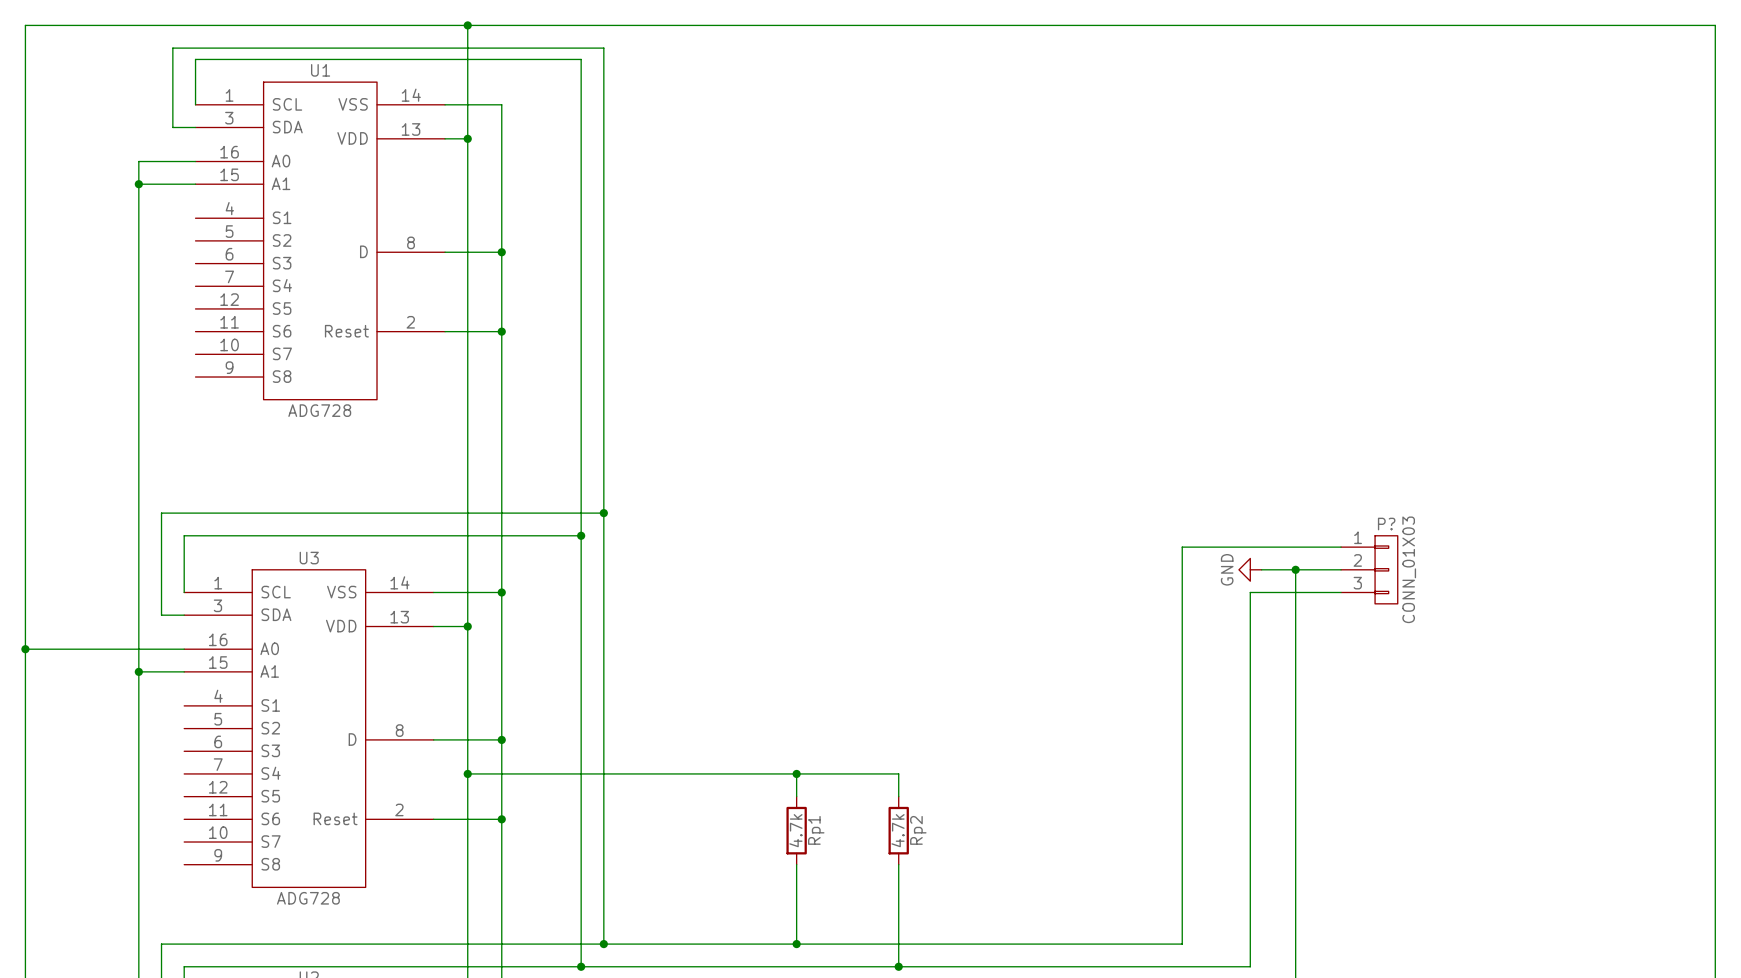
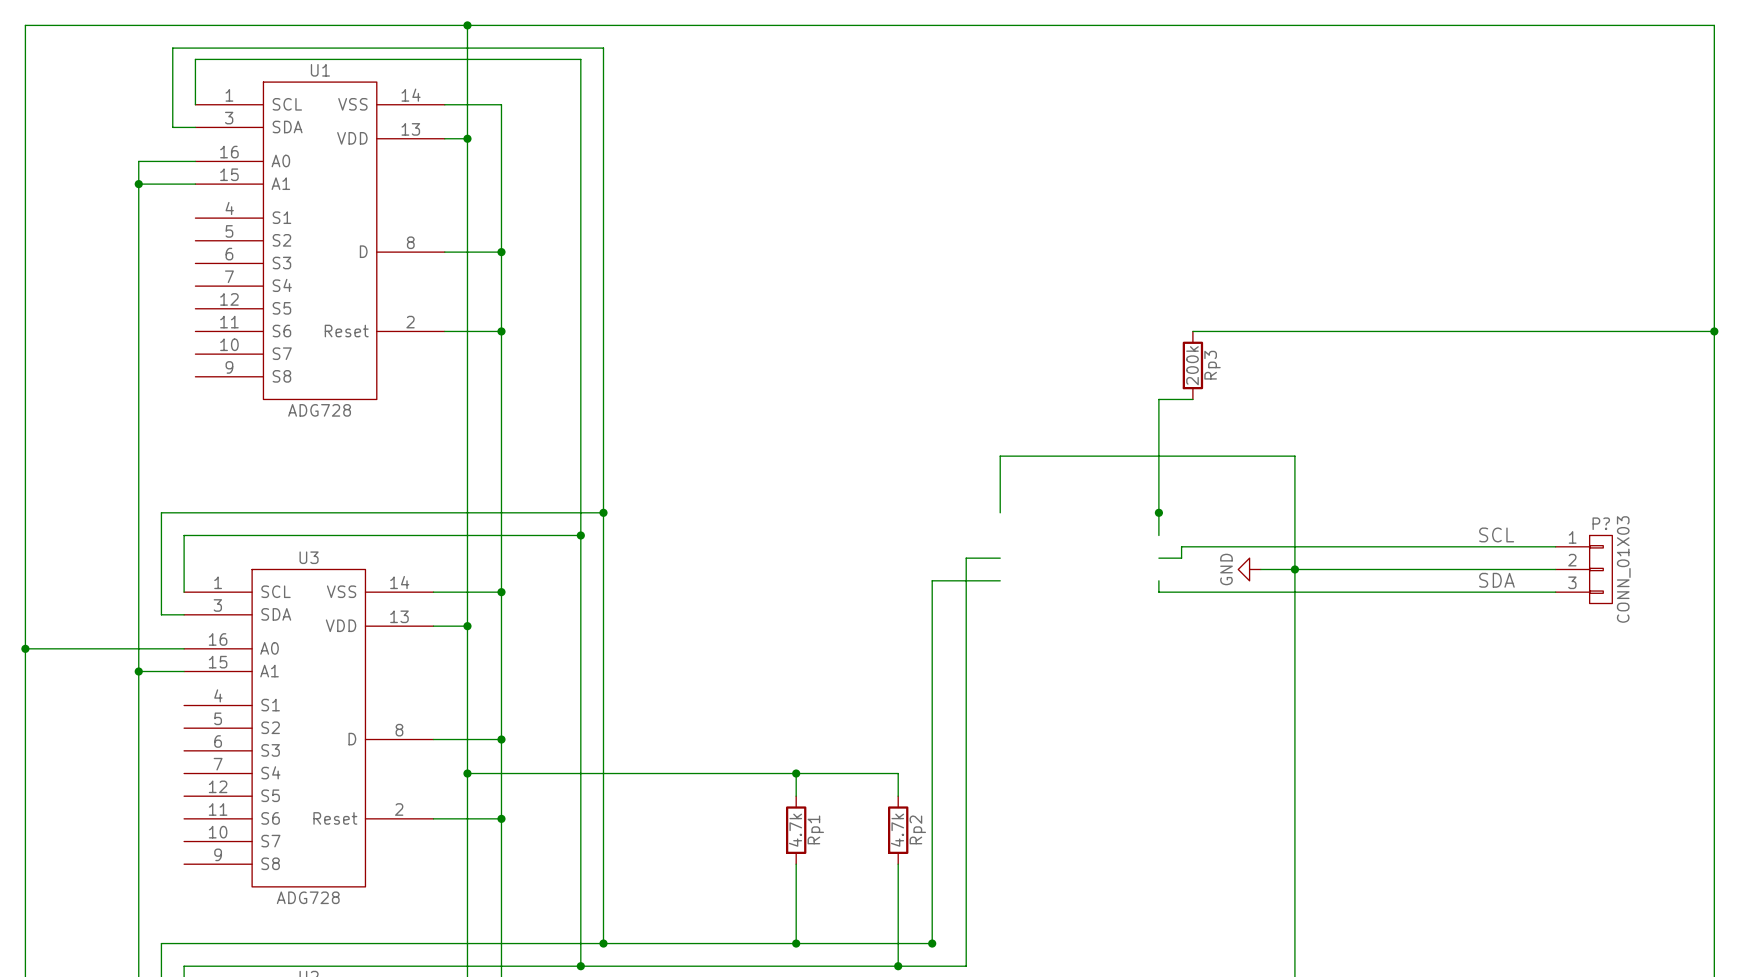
wire: none -> (1192, 331) (1714, 331)
junction: none -> (1714, 331)
Rp3: none -> 200k (1192, 365)
wire: none -> (1192, 399) (1158, 399) (1158, 535)
wire: none -> (1000, 512) (1000, 456) (1294, 456) (1294, 569)
junction: none -> (1158, 512)
label: none -> SCL (1496, 534)
wire: none -> (1340, 546) (1555, 546)
wire: none -> (1158, 558) (1181, 558)
wire: (1182, 558) (1182, 944) (932, 944) -> (1000, 580) (932, 580) (932, 943)
wire: none -> (1340, 569) (1555, 569)
P? position: (1369, 569) -> (1583, 569)
label: none -> SDA (1496, 580)
wire: none -> (1158, 580) (1158, 592) (1249, 592)
wire: (1250, 592) (1250, 966) (966, 966) -> (1000, 558) (966, 558) (966, 966)
wire: none -> (1340, 592) (1555, 592)
junction: none -> (932, 943)

